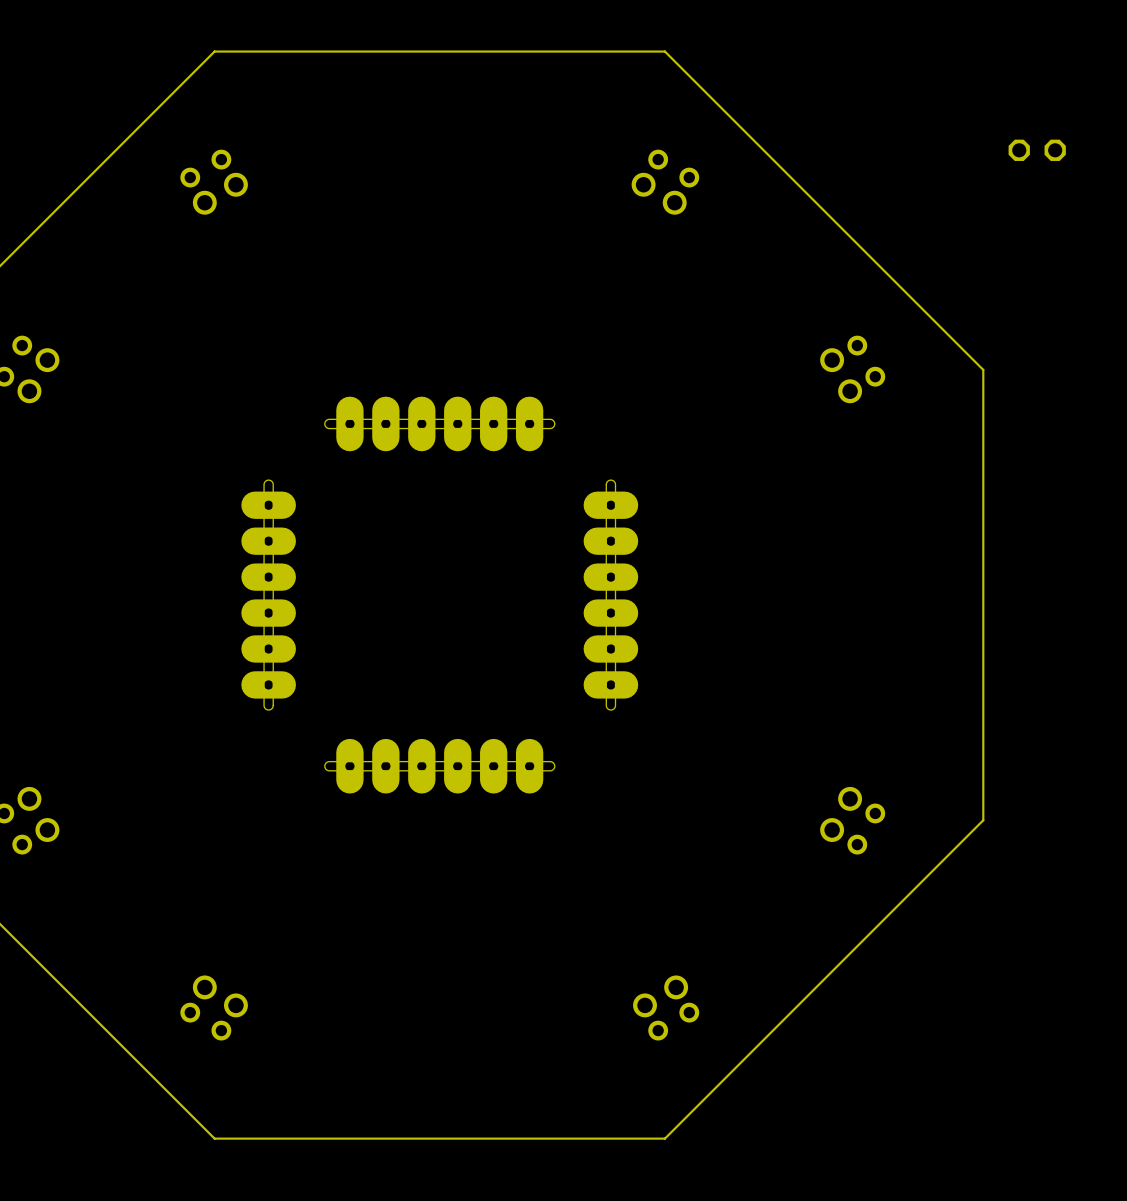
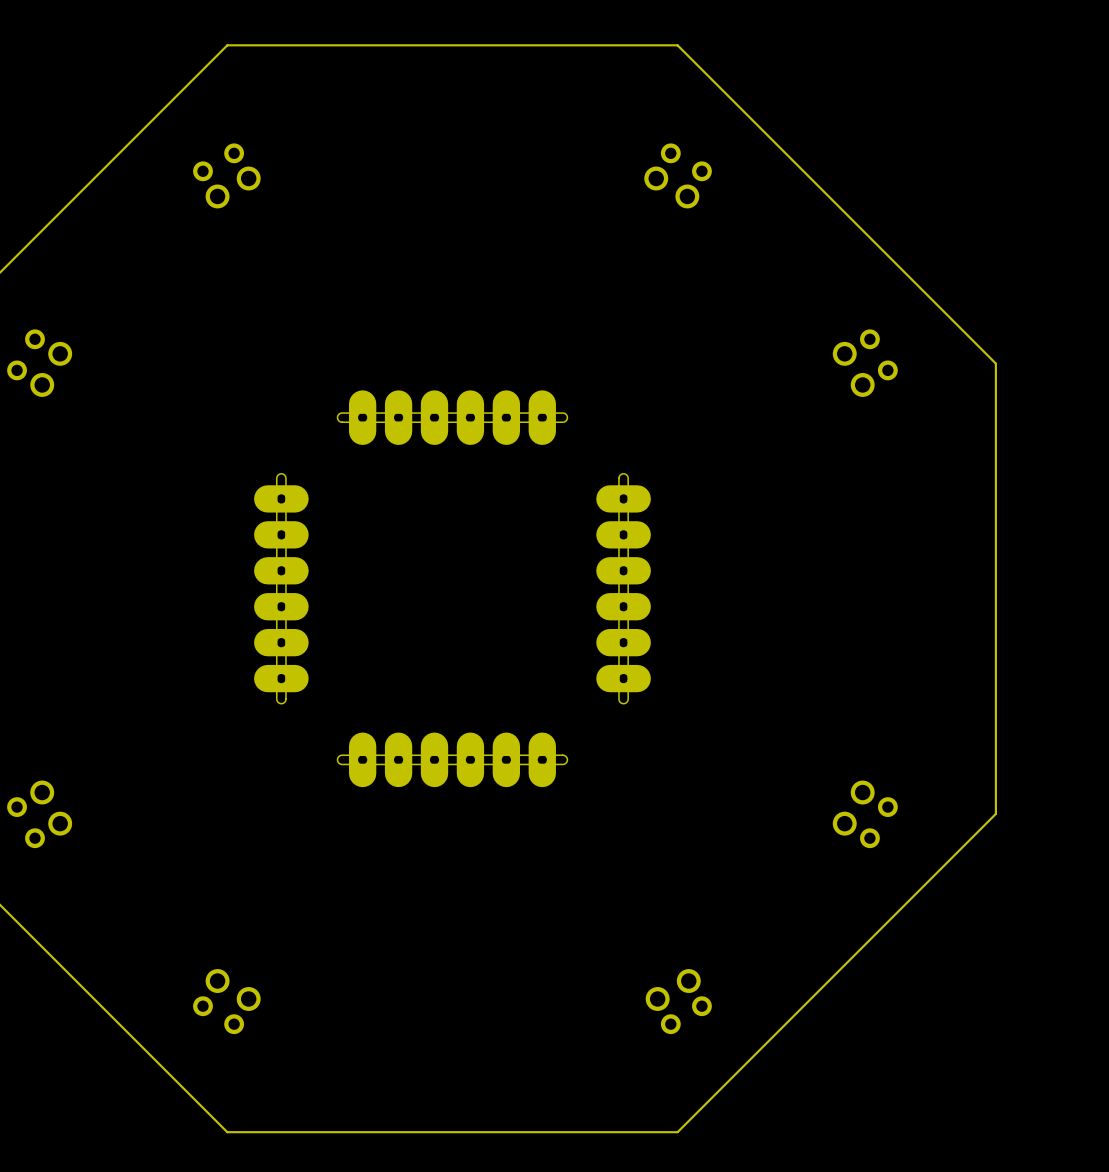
part: (1019, 150) -> none
part: (1055, 150) -> none

